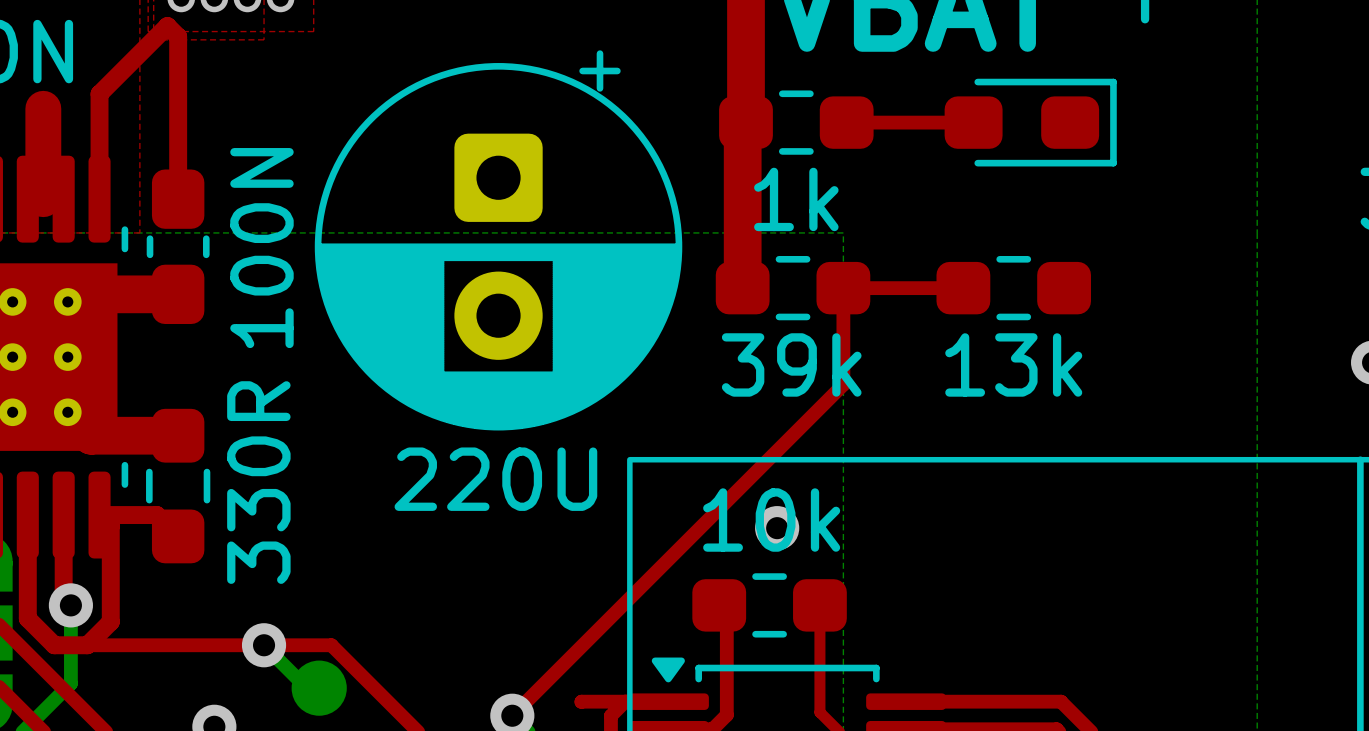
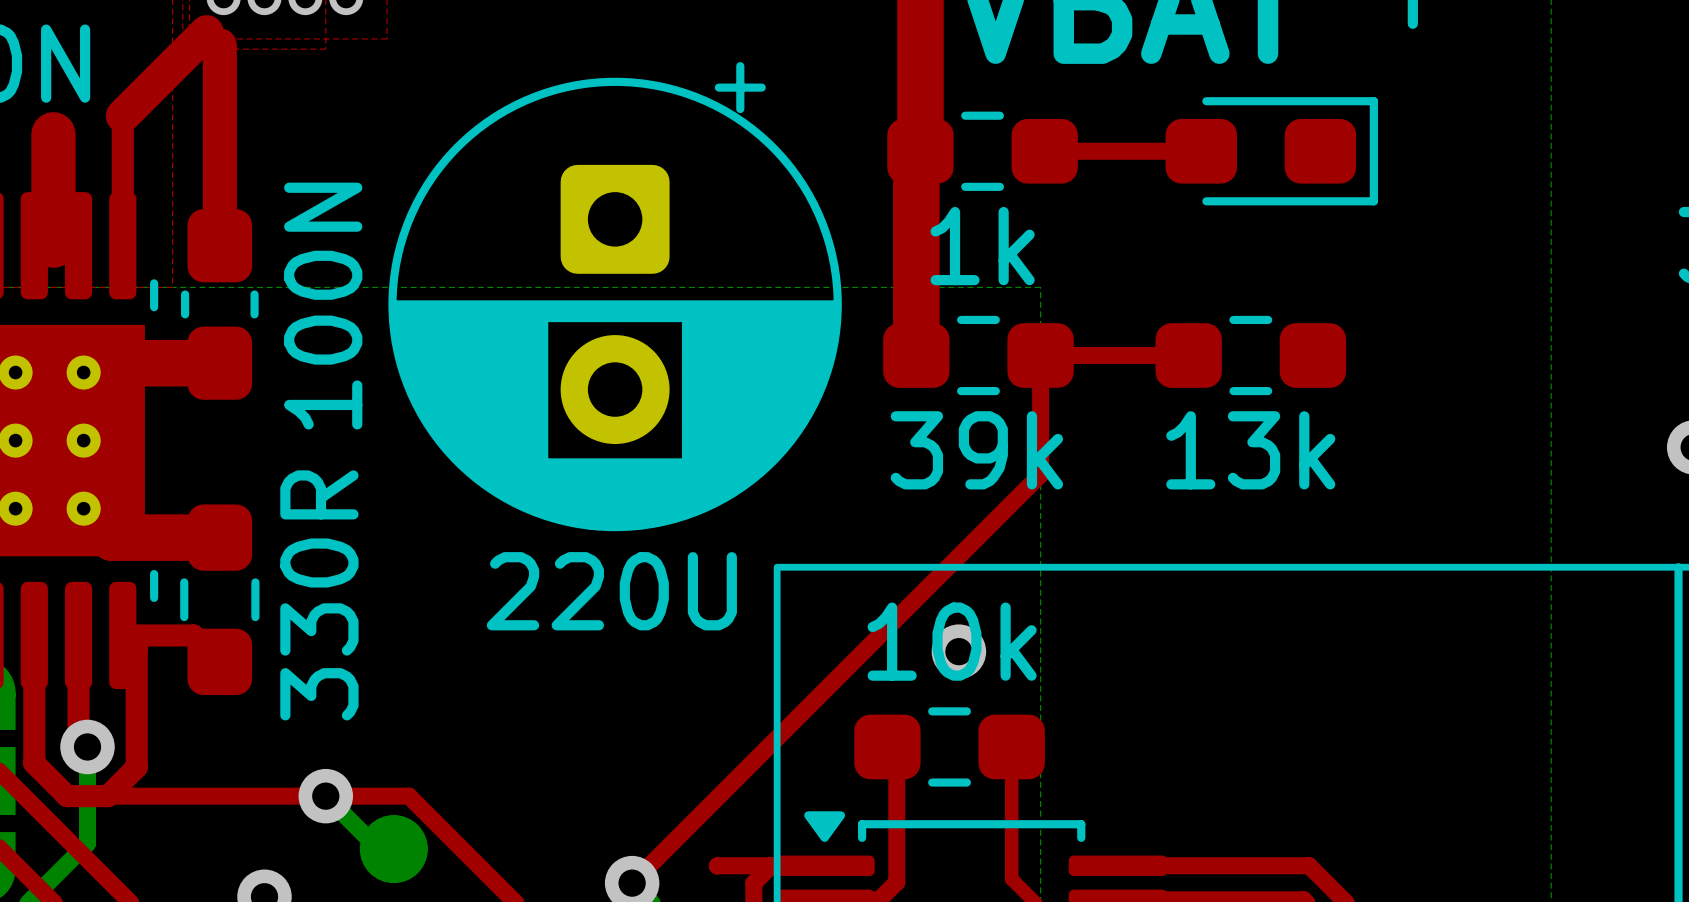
top track width: thin (167, 26) (99, 93) -> thick (206, 32) (122, 115)
top track width: thin (178, 36) (178, 199) -> thick (219, 45) (219, 245)

